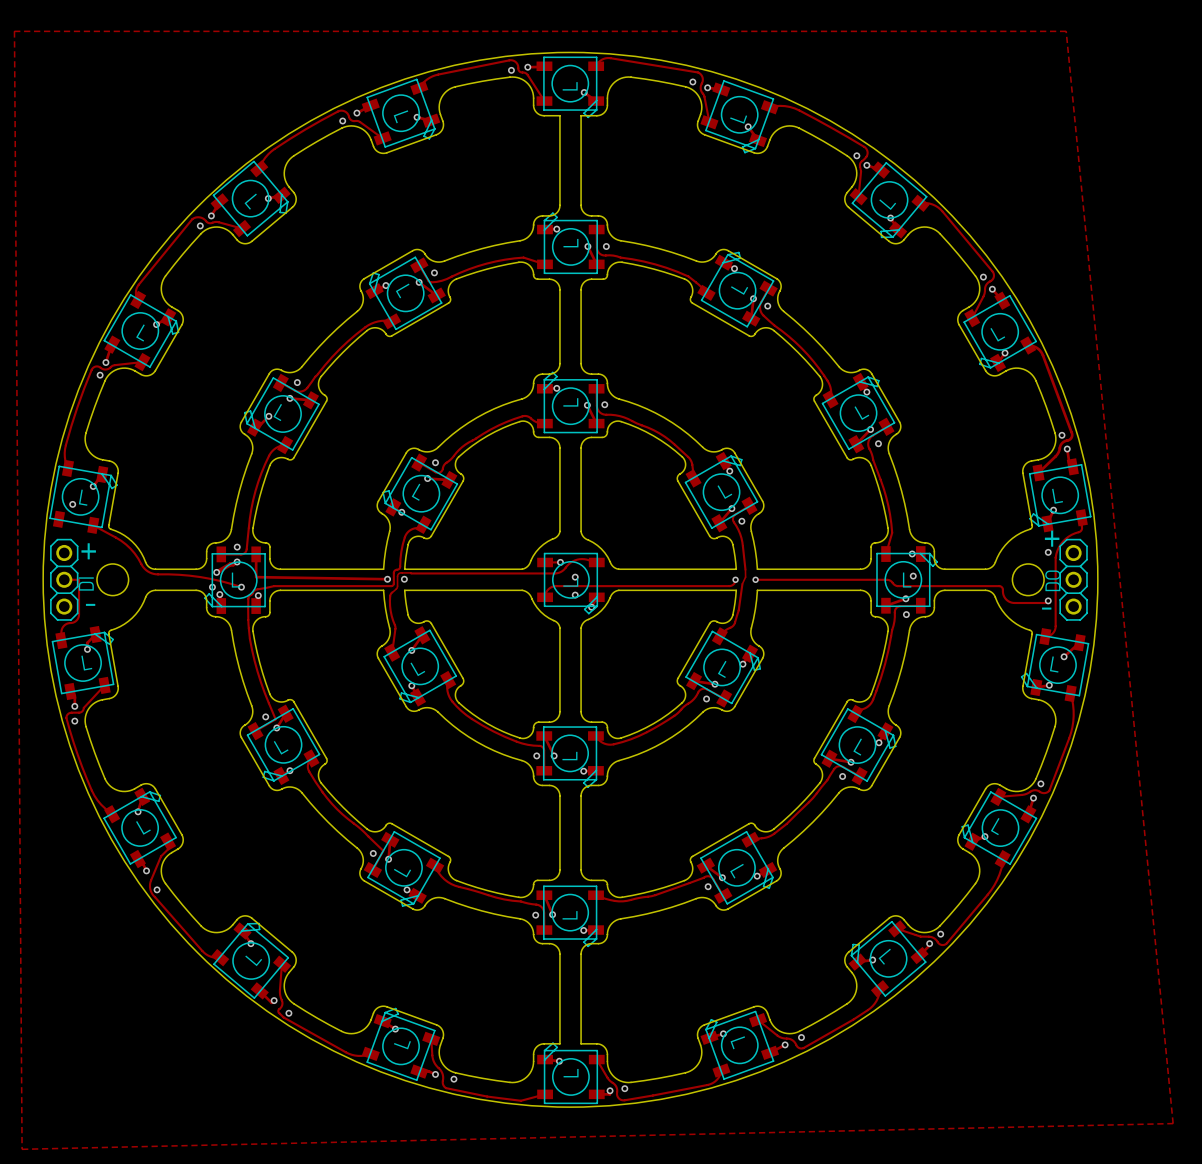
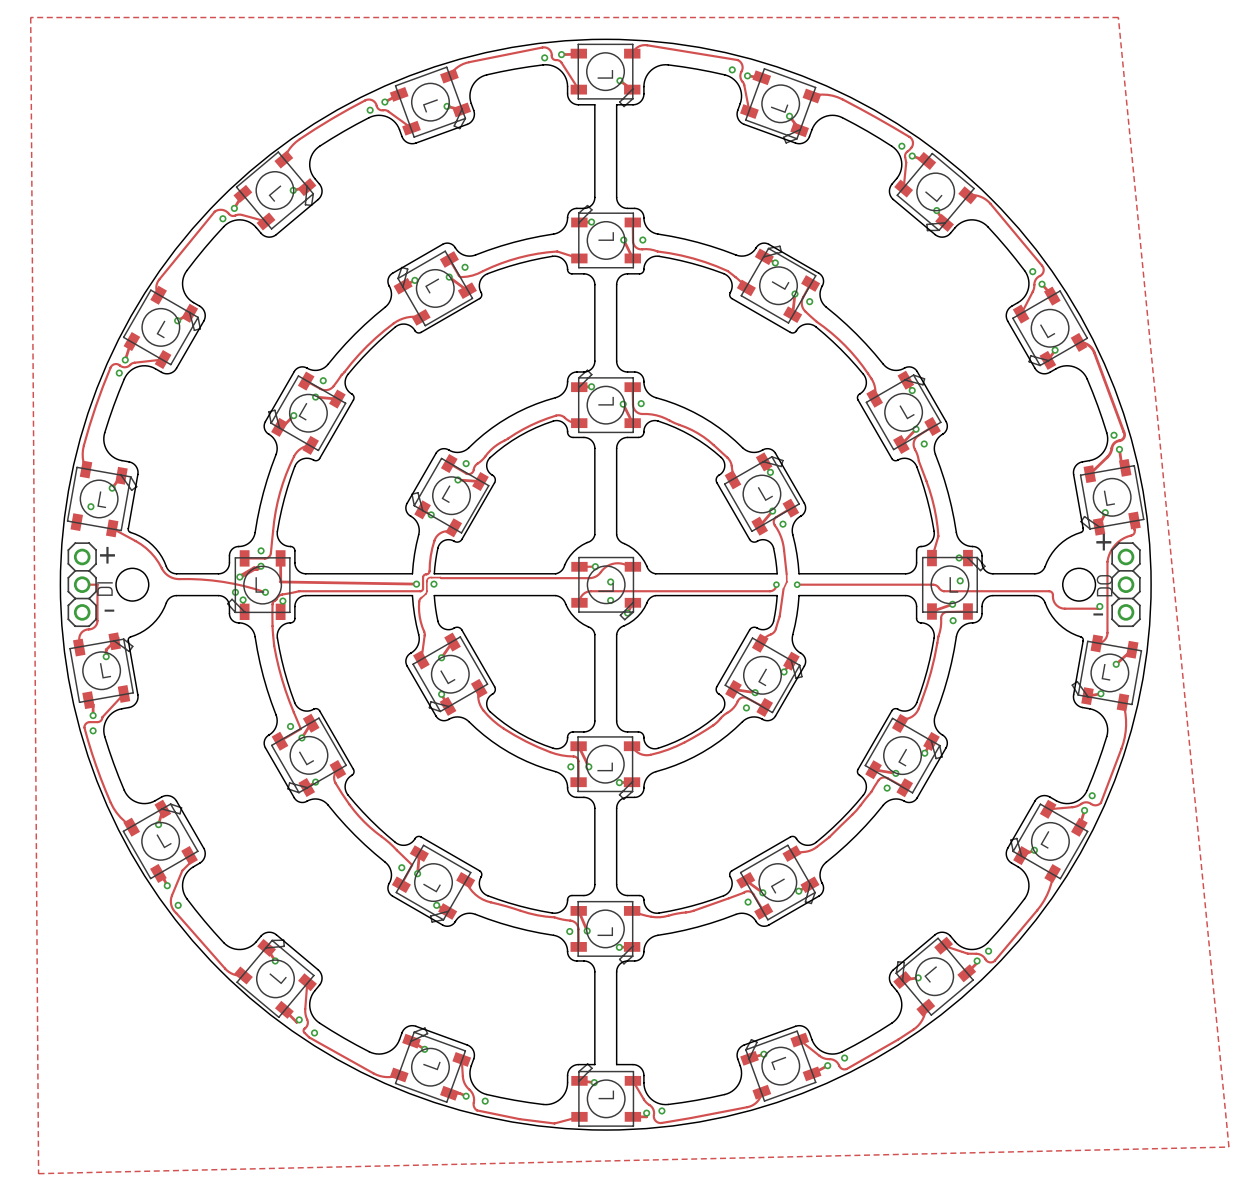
via: (1048, 552) -> none

